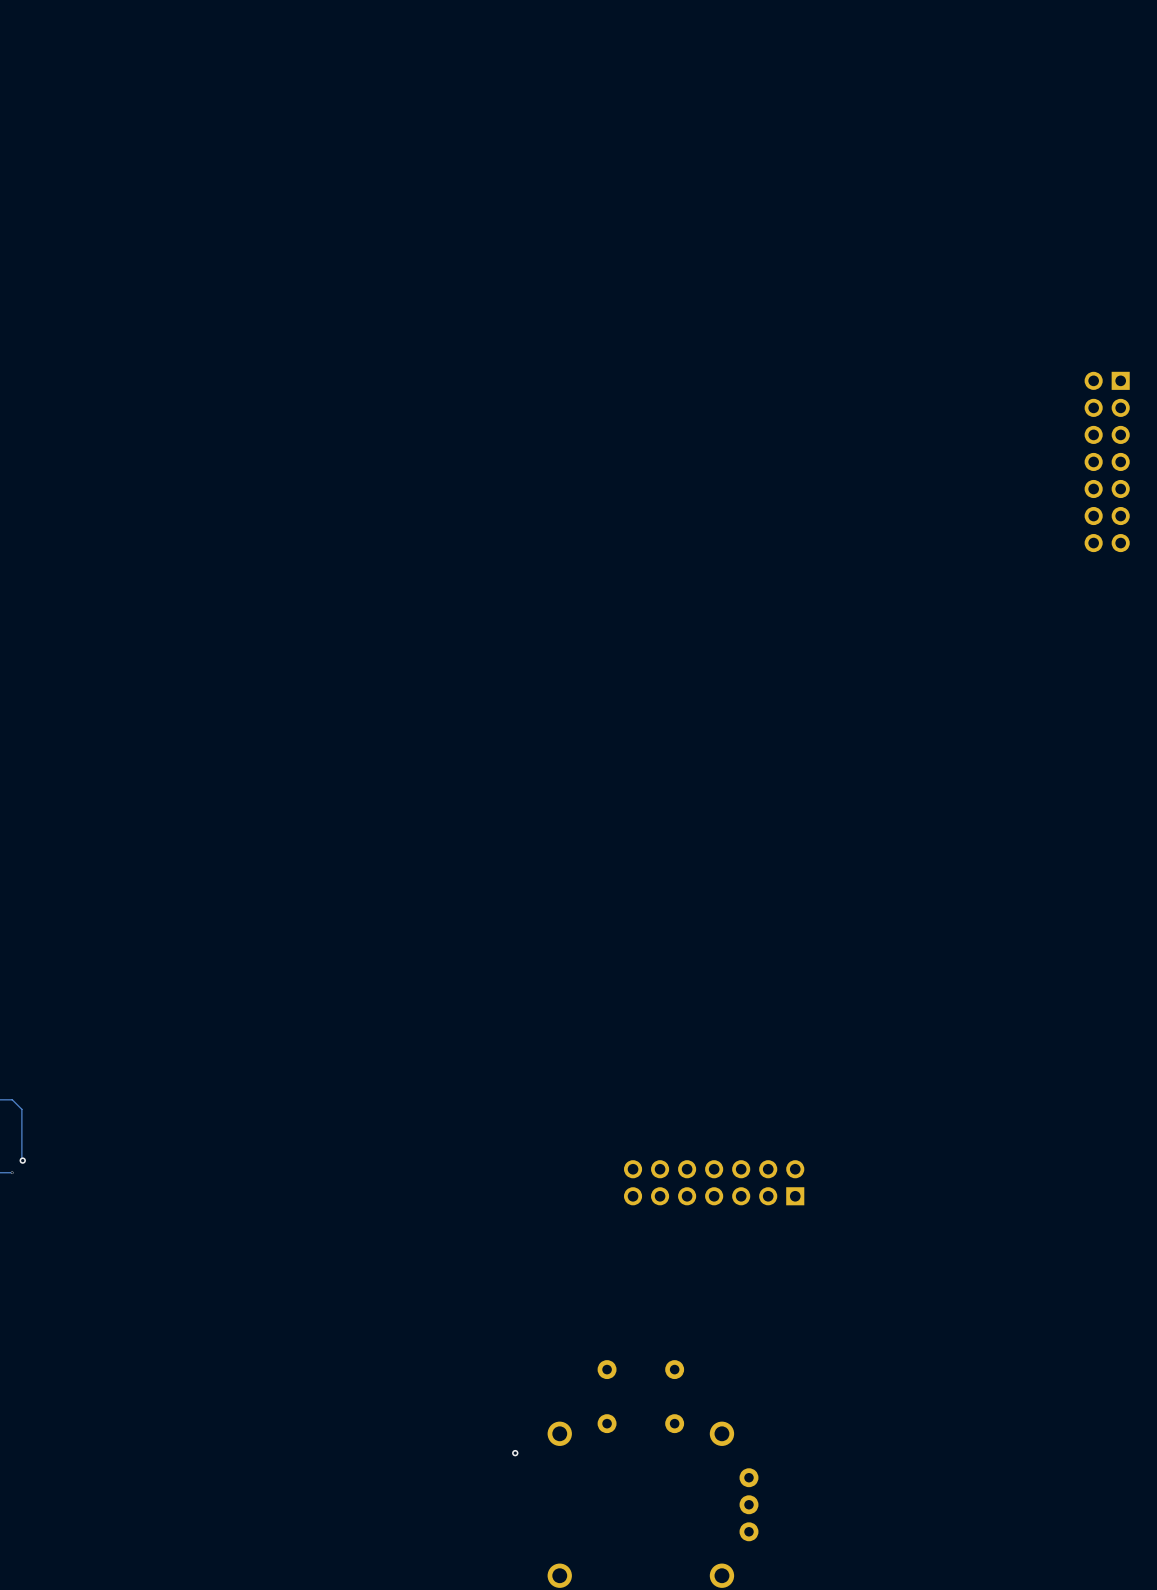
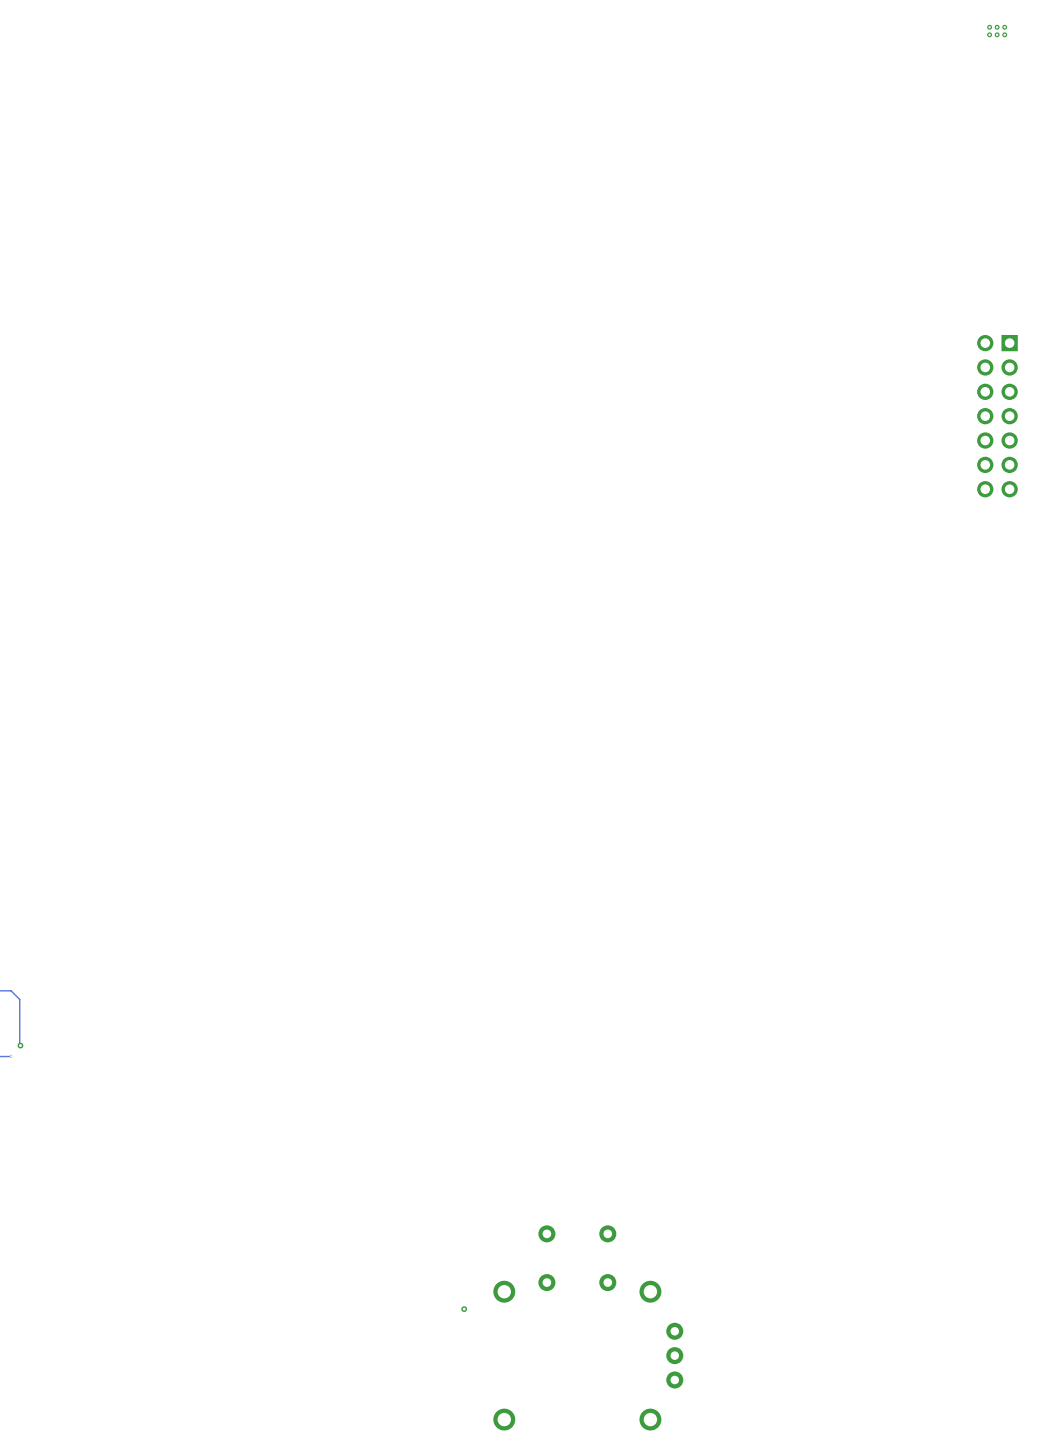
part: none -> (997, 31)
part: (714, 1182) -> none

